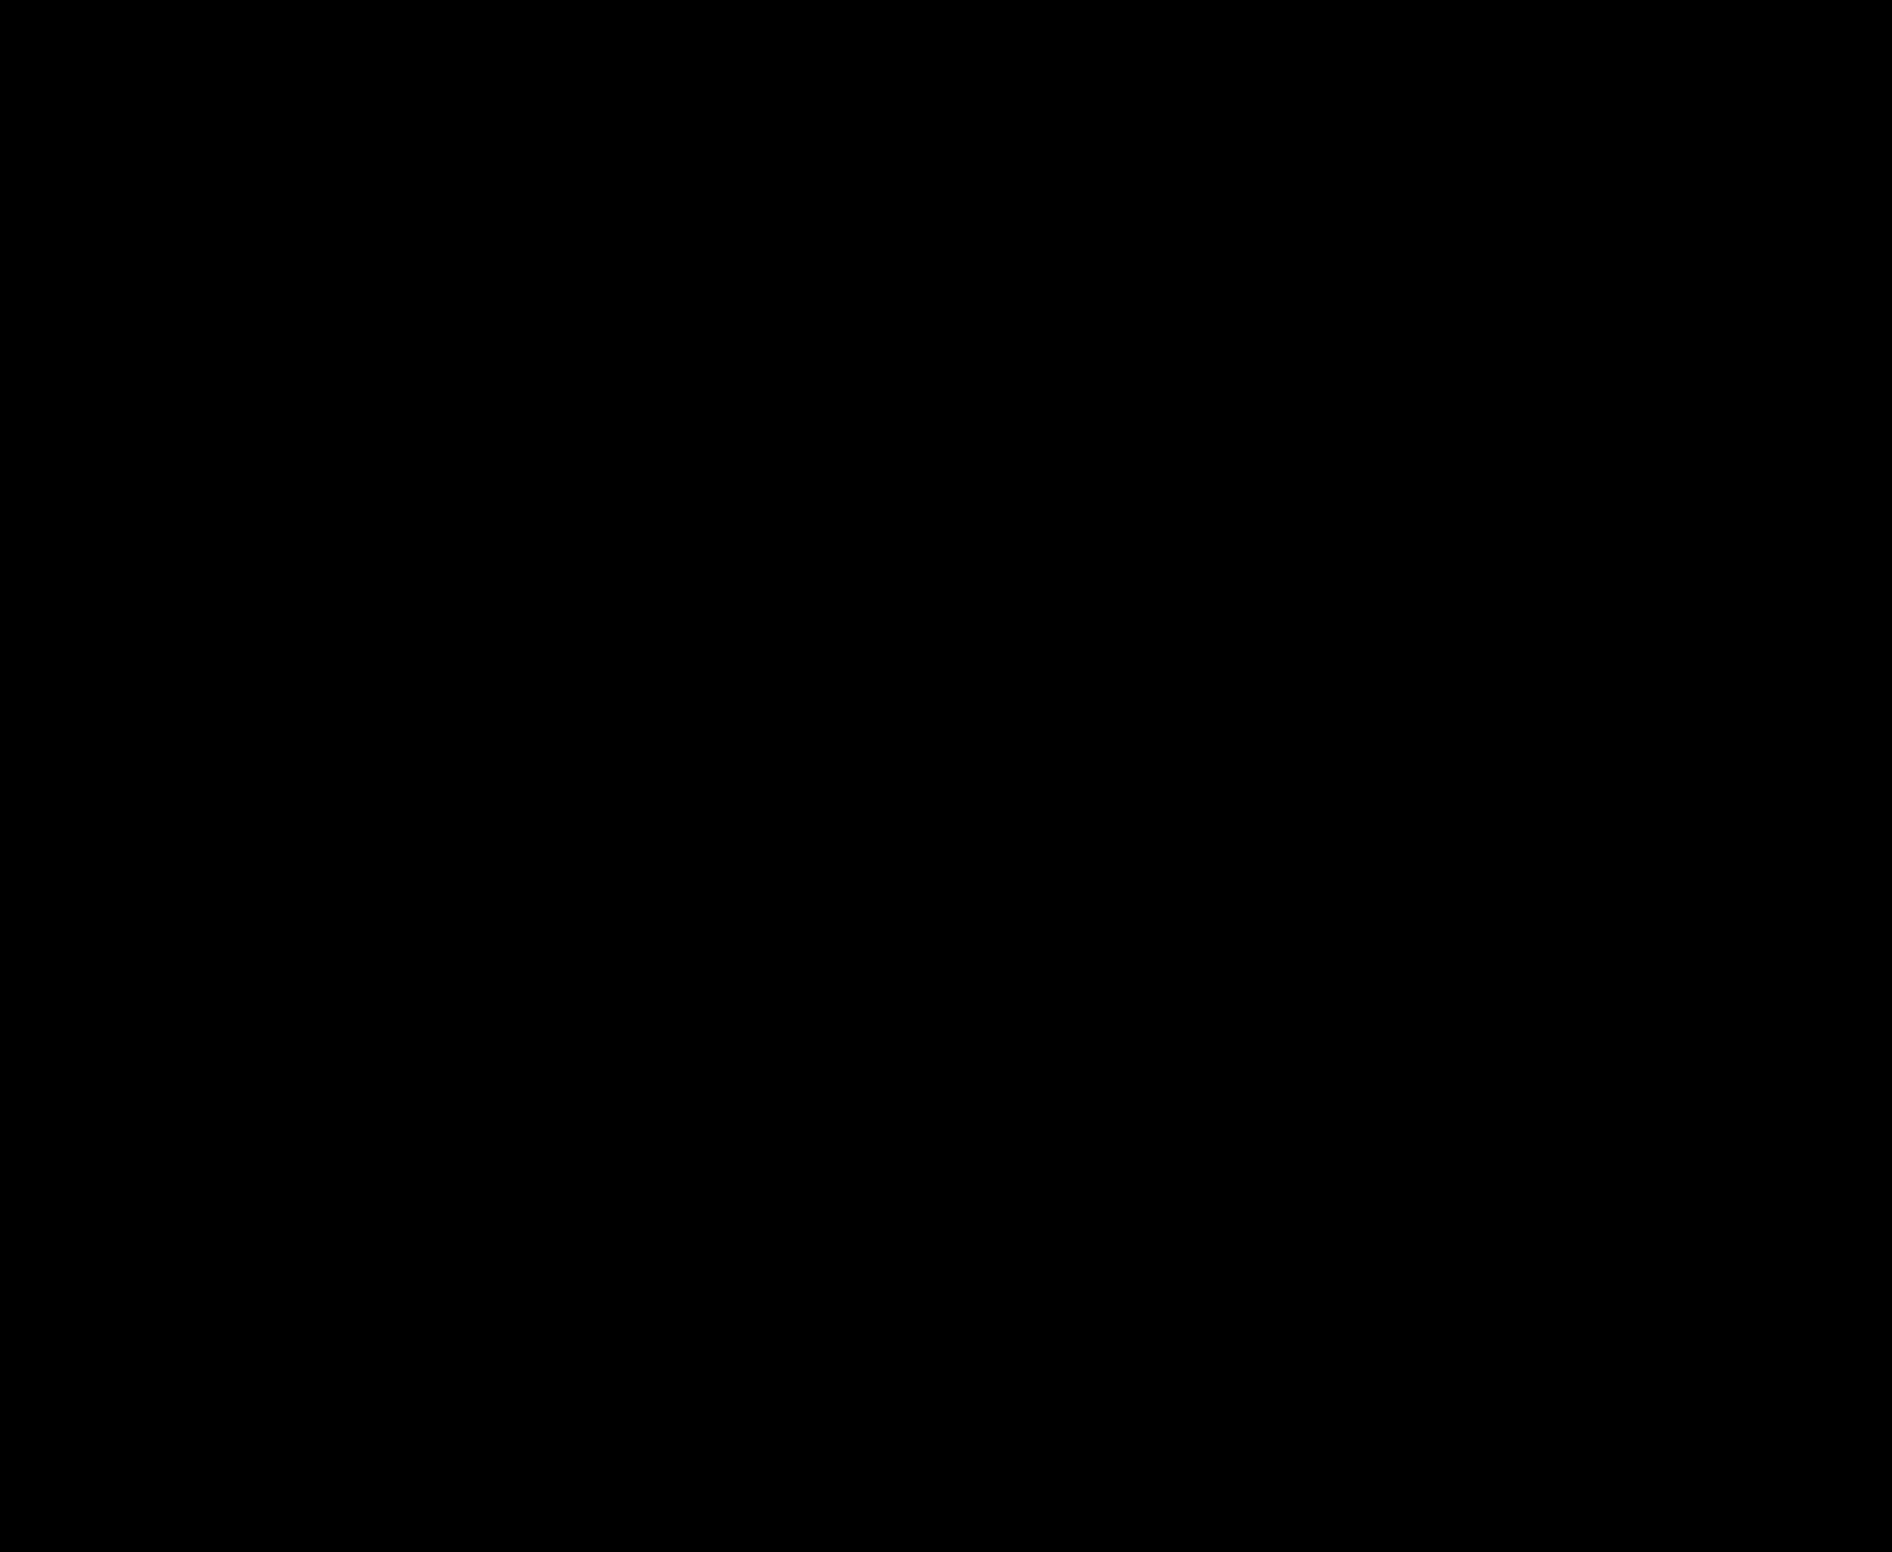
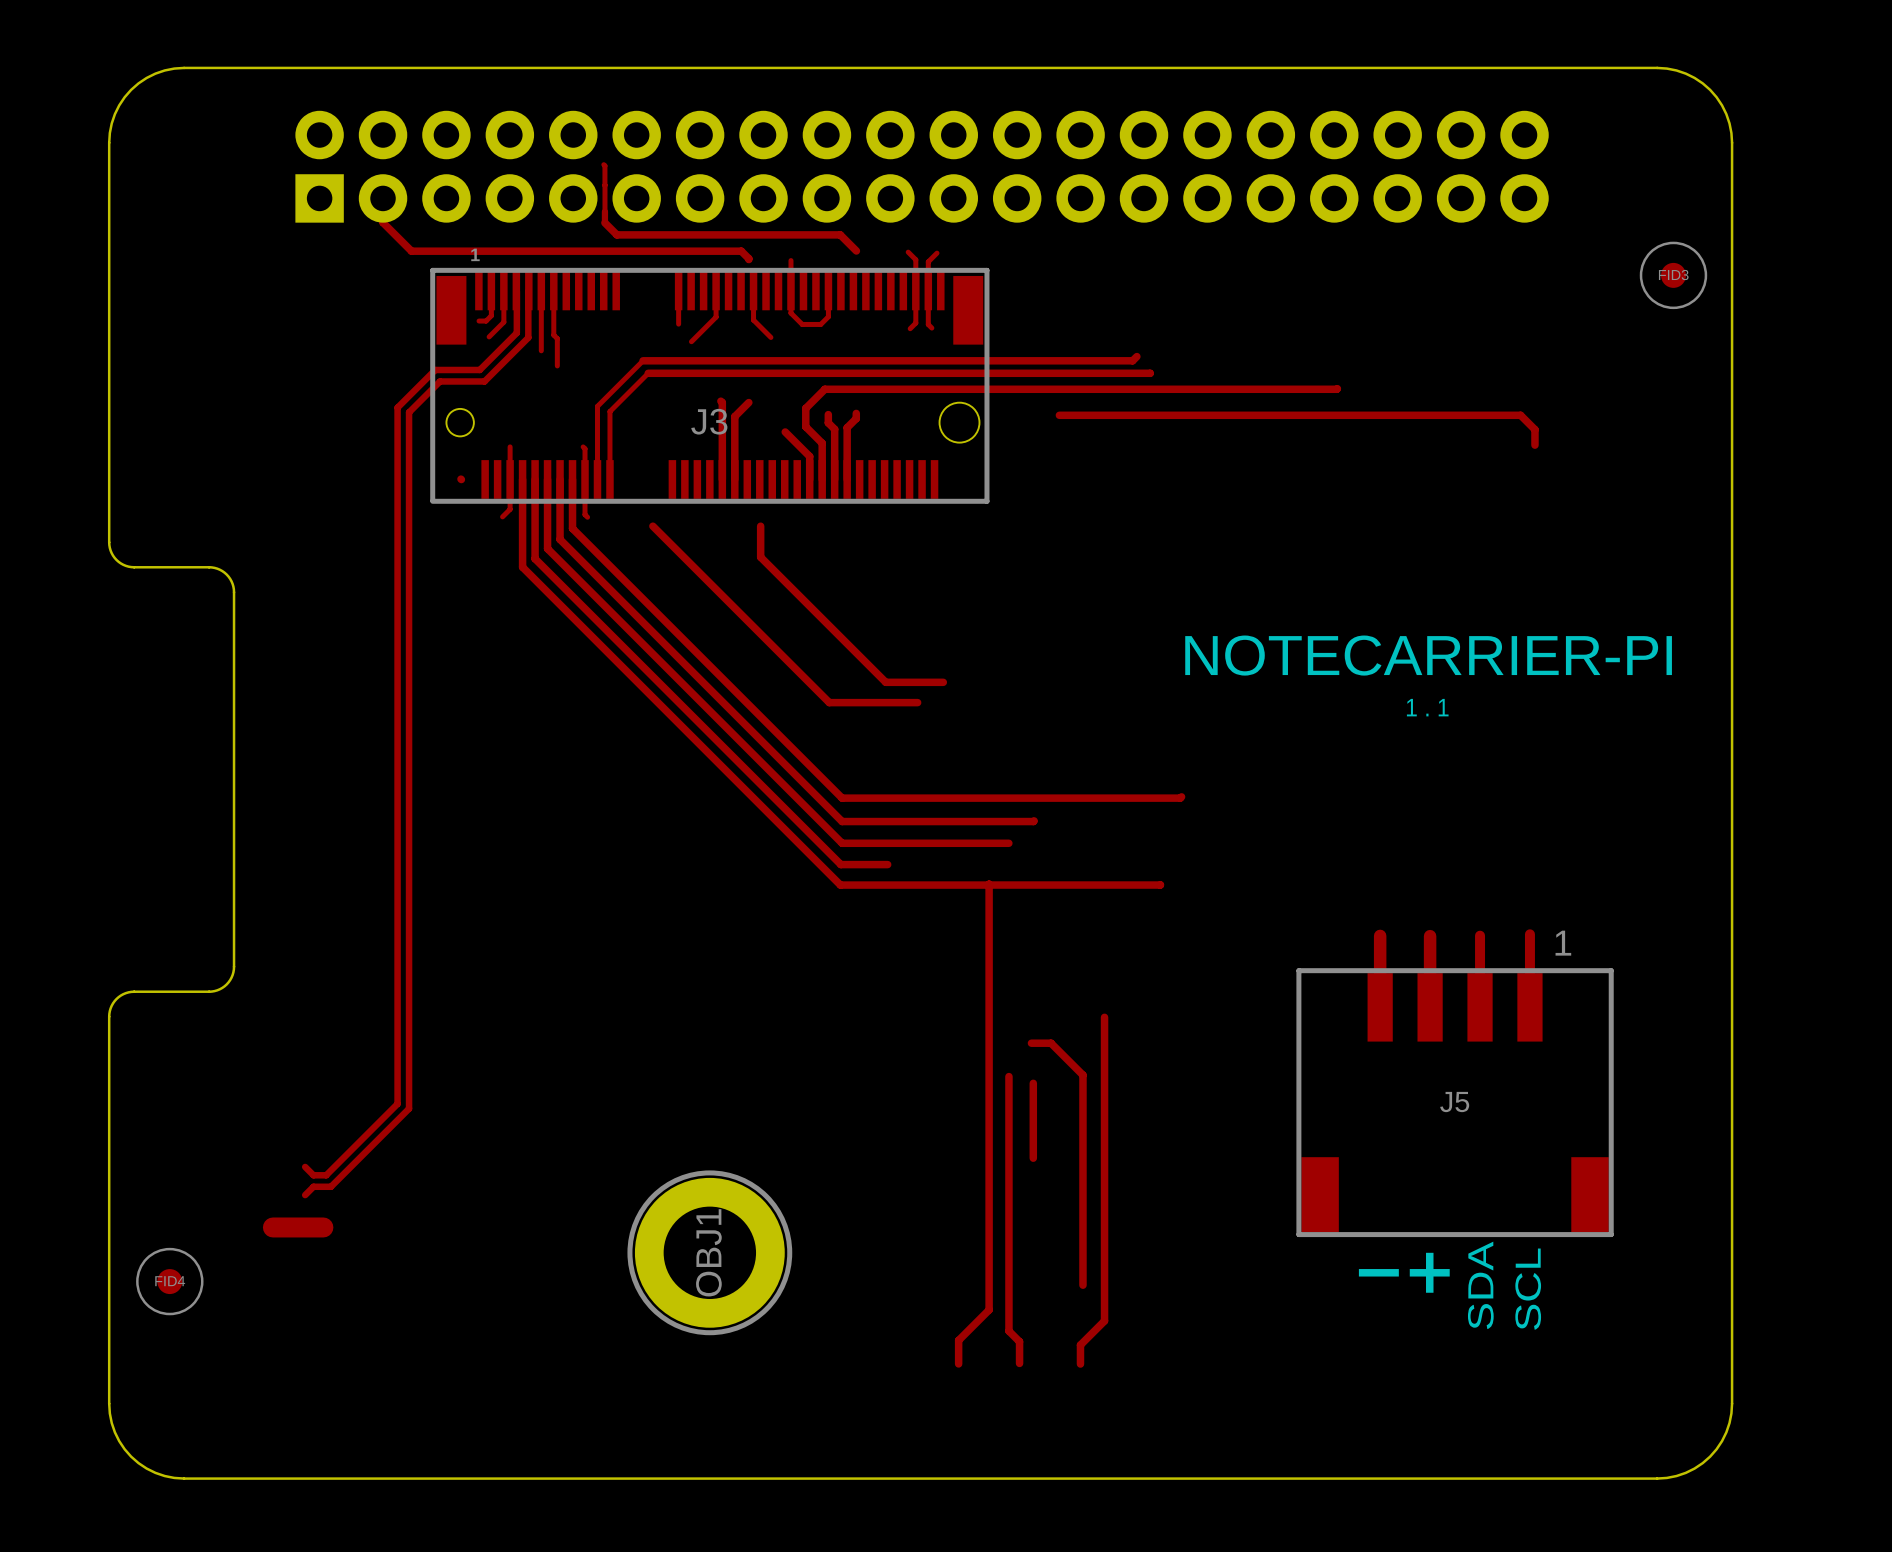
board edge: none -> (184, 67) (1657, 67) (1685, 73) (1710, 89) (1726, 114) (1732, 142) (1732, 1403) (1726, 1432) (1710, 1456) (1685, 1472) (1657, 1478) (184, 1478) (155, 1472) (131, 1456) (114, 1432) (109, 1403) (109, 1011) (116, 999) (128, 992) (217, 990) (228, 982) (234, 966) (232, 583) (224, 572) (211, 567) (125, 565) (113, 555) (109, 542) (109, 133) (114, 114) (131, 89) (155, 73) (184, 67)
track: none -> (603, 164) (604, 222) (616, 234) (840, 234) (856, 250)
part: none -> (922, 166)
track: none -> (383, 198) (383, 222) (411, 251) (741, 251) (748, 259)
track: none -> (908, 252) (915, 259) (915, 323) (910, 328)
track: none -> (936, 253) (928, 261) (928, 324) (931, 328)
track: none -> (790, 260) (790, 313) (802, 324) (820, 324) (828, 316) (828, 290)
FID3: none -> (1673, 275)
track: none -> (491, 290) (491, 315) (486, 321) (479, 321)
track: none -> (503, 290) (503, 322) (489, 336)
track: none -> (516, 290) (516, 332) (479, 369) (435, 369) (397, 407) (397, 1103) (326, 1175) (313, 1175) (305, 1166)
track: none -> (528, 290) (528, 337) (484, 381) (440, 381) (409, 412) (409, 1108) (330, 1186) (313, 1186) (305, 1195)
track: none -> (541, 290) (541, 350)
track: none -> (553, 290) (553, 335) (557, 338) (557, 365)
track: none -> (678, 290) (678, 324)
track: none -> (716, 290) (716, 317) (691, 341)
track: none -> (753, 290) (753, 320) (770, 337)
track: none -> (1136, 356) (1132, 360) (643, 360) (597, 406) (597, 479)
track: none -> (1150, 373) (648, 373) (609, 411) (609, 479)
J3: none -> (709, 385)
track: none -> (1337, 388) (824, 389) (805, 408) (805, 426) (822, 443) (822, 479)
track: none -> (720, 401) (722, 479)
track: none -> (748, 402) (734, 416) (734, 479)
track: none -> (856, 413) (856, 418) (847, 427) (847, 479)
track: none -> (828, 414) (828, 422) (834, 429) (834, 479)
track: none -> (1059, 415) (1520, 415) (1534, 429) (1534, 445)
track: none -> (785, 431) (809, 456) (809, 479)
track: none -> (510, 446) (510, 509) (502, 516)
track: none -> (583, 446) (585, 448) (585, 514) (587, 517)
track: none -> (460, 479) (461, 479)
track: none -> (522, 479) (522, 567) (840, 885) (989, 884)
track: none -> (535, 479) (535, 558) (840, 864) (887, 864)
track: none -> (547, 479) (547, 548) (842, 843) (1008, 843)
track: none -> (560, 479) (560, 539) (842, 821) (1034, 820)
track: none -> (572, 479) (572, 528) (842, 798) (1181, 796)
track: none -> (652, 526) (829, 702) (917, 702)
track: none -> (760, 526) (760, 557) (885, 682) (943, 682)
text: none -> NOTECARRIER-PI (1428, 655)
text: none -> 1 . 1 (1427, 707)
track: none -> (989, 884) (989, 1309) (958, 1340) (958, 1363)
track: none -> (989, 884) (1160, 885)
track: none -> (1529, 934) (1529, 1007)
track: none -> (1380, 935) (1380, 1007)
track: none -> (1480, 935) (1480, 1007)
track: none -> (1430, 936) (1430, 1007)
track: none -> (1104, 1017) (1104, 1320) (1080, 1345) (1080, 1364)
track: none -> (1031, 1043) (1051, 1043) (1082, 1075) (1082, 1285)
track: none -> (1008, 1076) (1008, 1331) (1019, 1341) (1019, 1363)
track: none -> (1033, 1083) (1033, 1158)
J5: none -> (1455, 1102)
track: none -> (272, 1227) (323, 1227)
OBJ1: none -> (709, 1252)
drawing: none -> [1358, 1252, 1450, 1293]
FID4: none -> (169, 1281)
text: none -> SDA (1480, 1285)
text: none -> SCL (1528, 1289)

